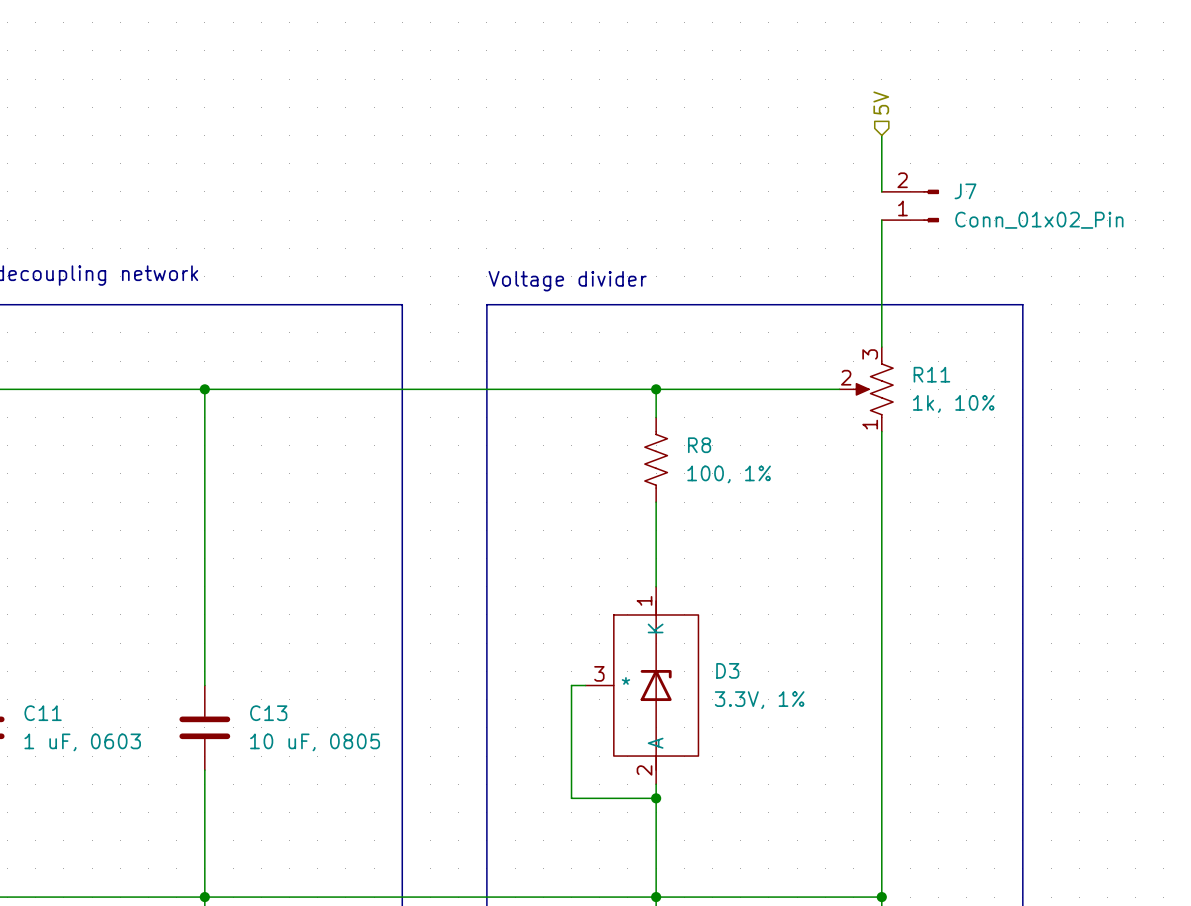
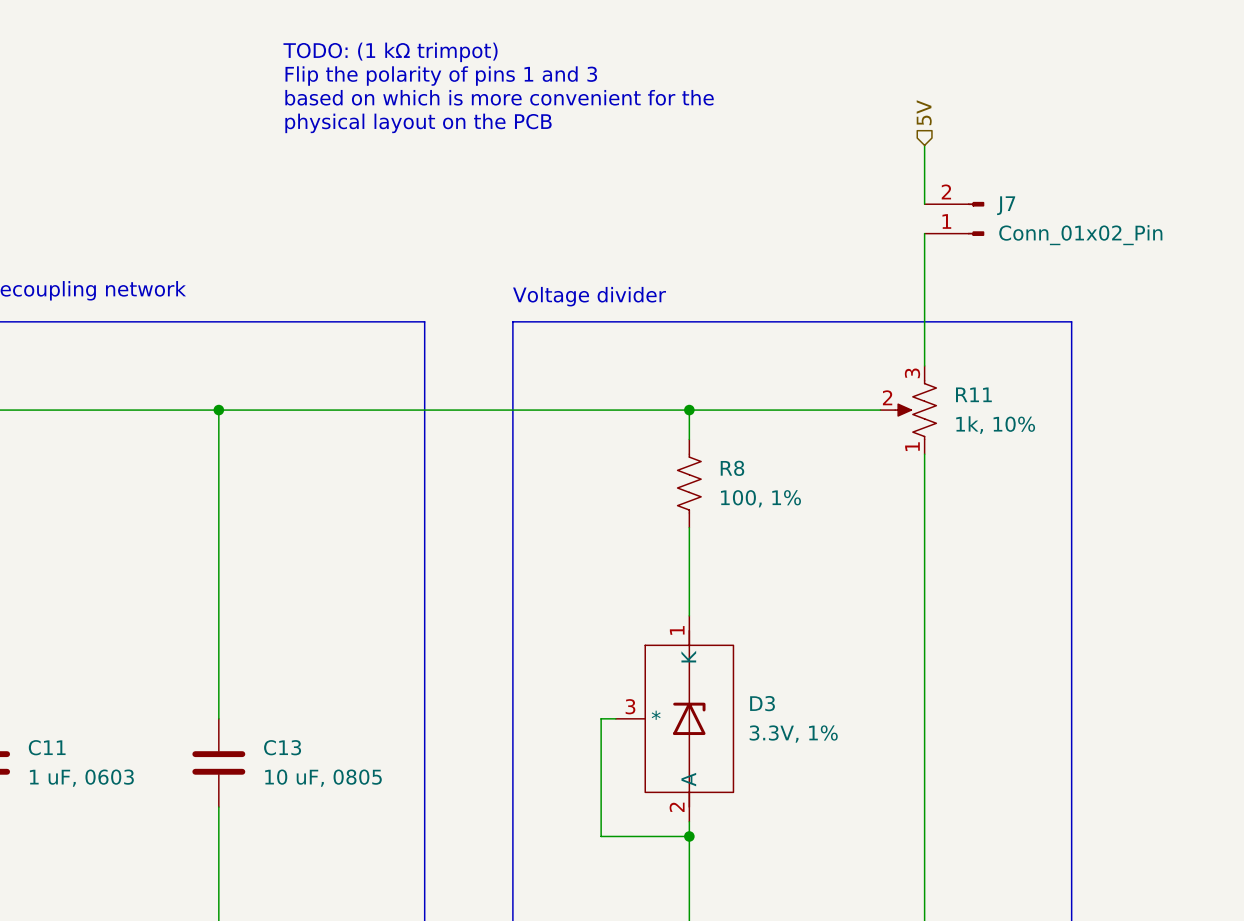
text: none -> TODO: (1 kΩ trimpot) (390, 52)
text: none -> Flip the polarity of pins 1 and 3 (441, 76)
text: none -> based on which is more convenient for the (499, 97)
text: none -> physical layout on the PCB (418, 123)

